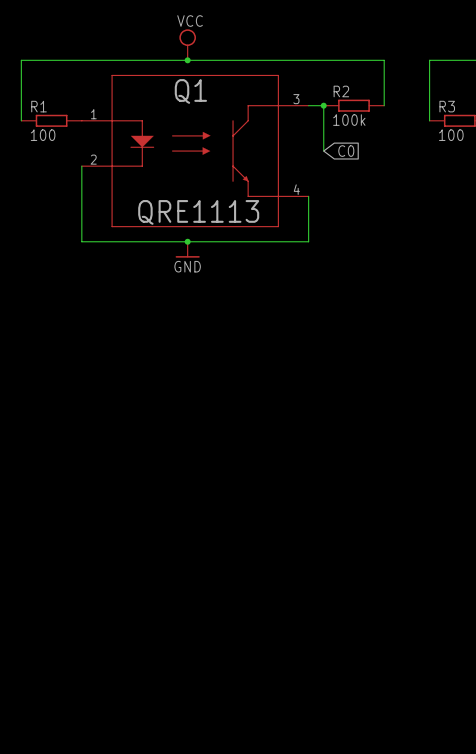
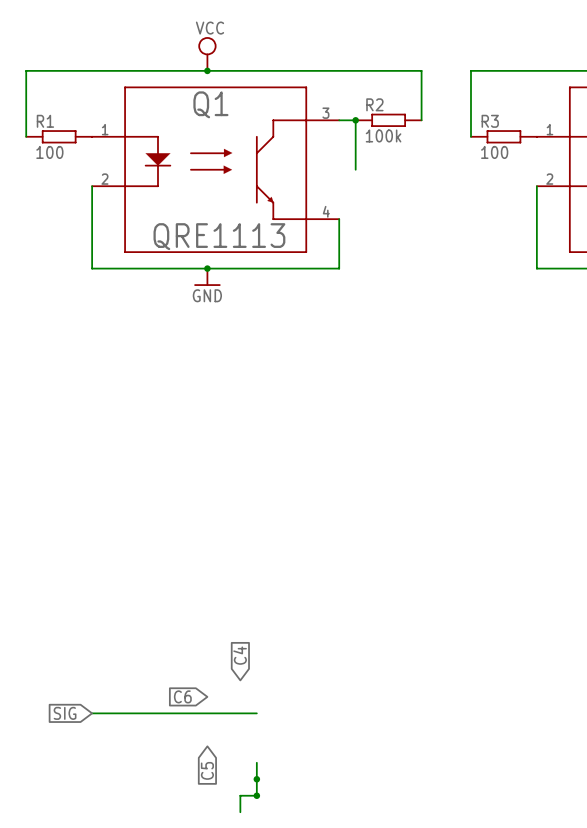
global label: C0 (346, 151) -> none
global label: none -> C4 (240, 655)
global label: none -> C6 (182, 696)
global label: none -> SIG (65, 713)
wire: none -> (92, 713) (256, 713)
wire: none -> (256, 762) (256, 795) (240, 795) (240, 812)
global label: none -> C5 (207, 770)
junction: none -> (256, 779)
junction: none -> (256, 795)

